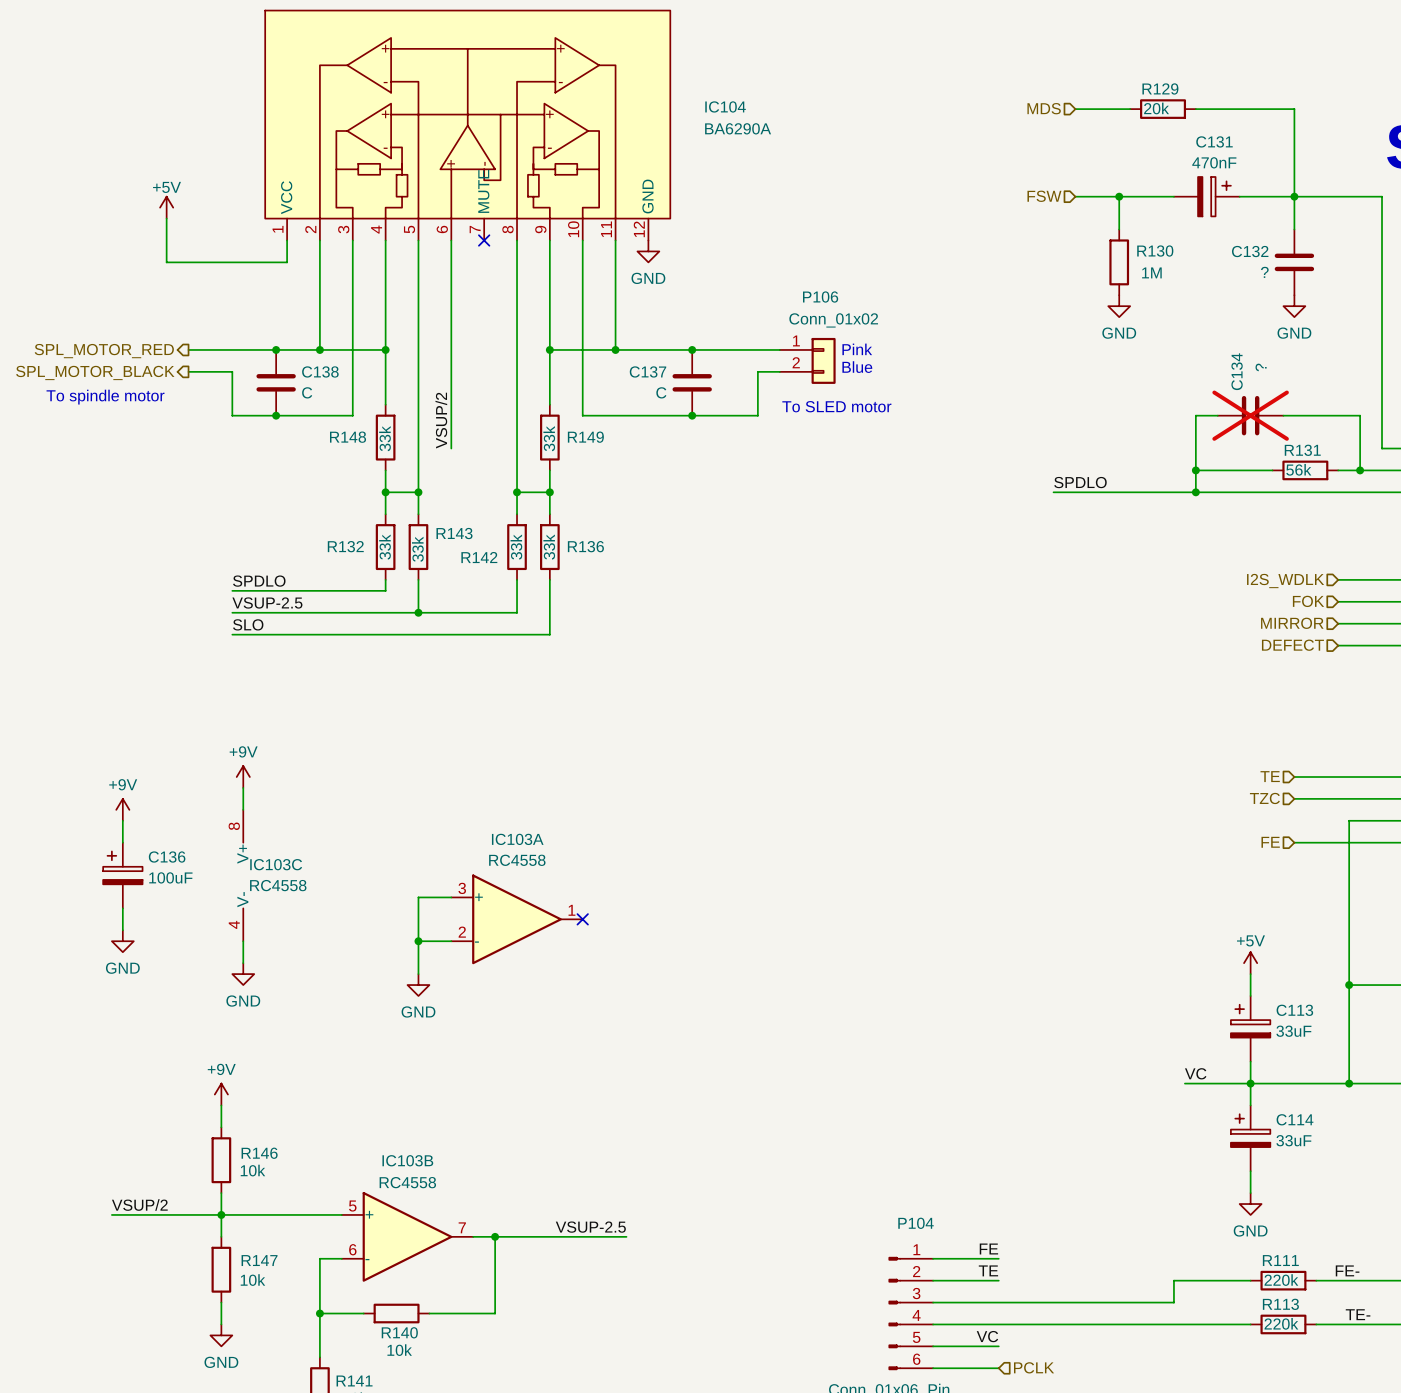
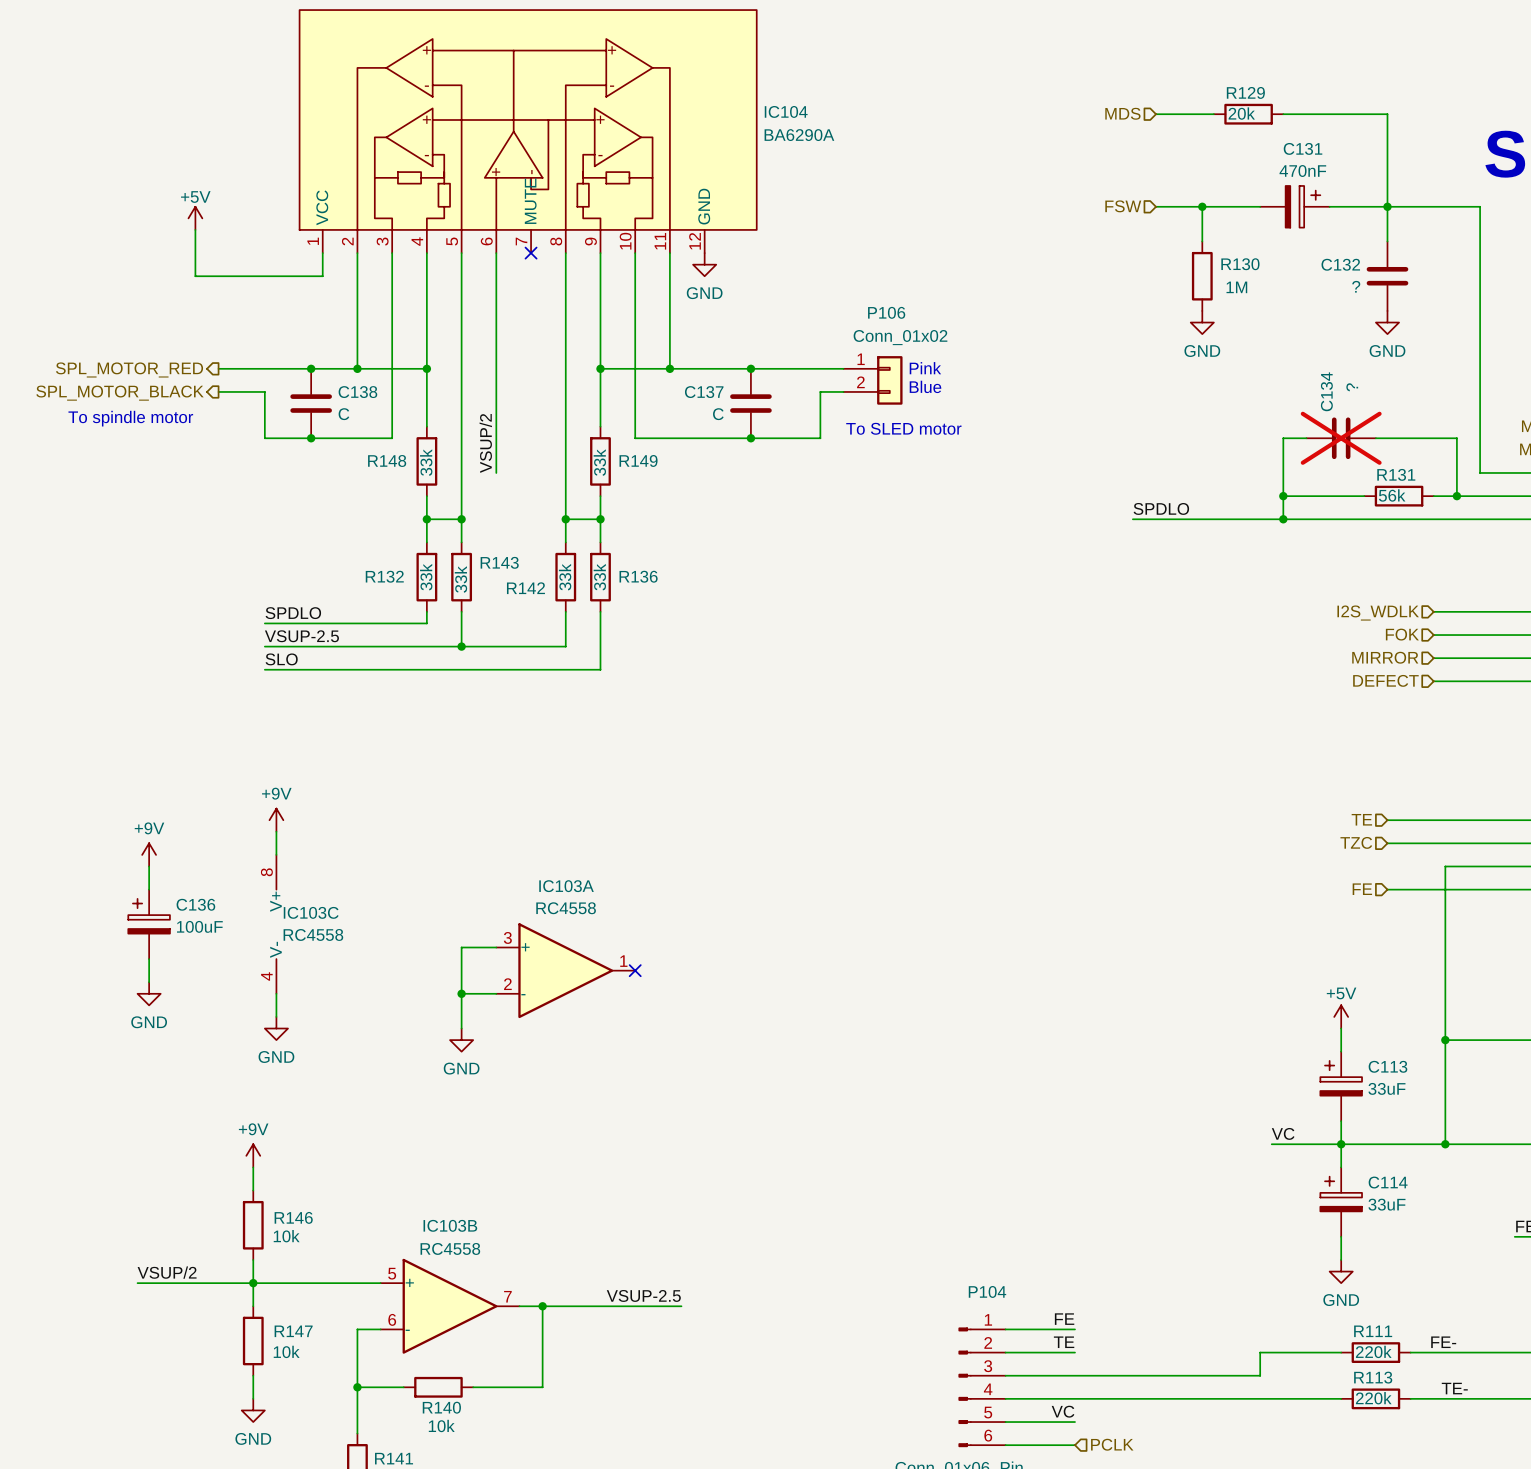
IC104 symbol: [264, 9, 671, 241] -> [298, 9, 758, 254]

